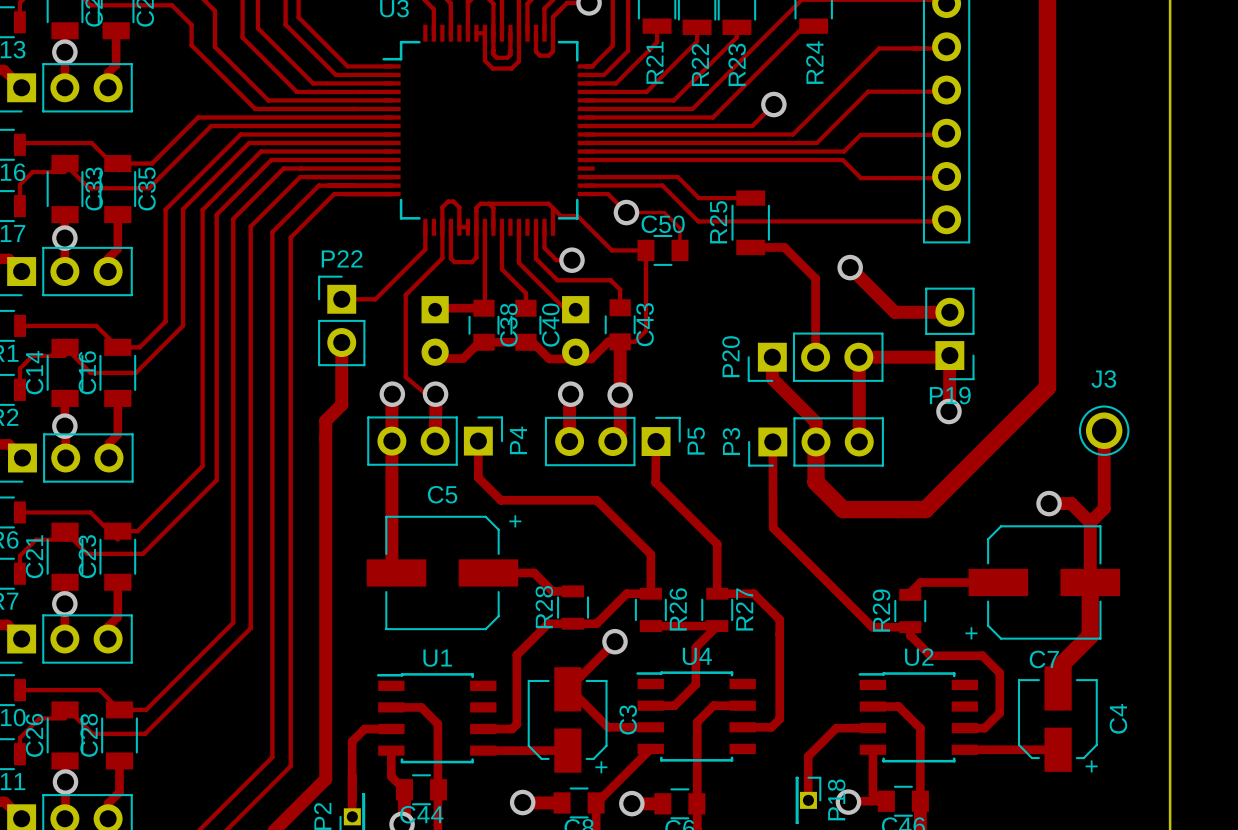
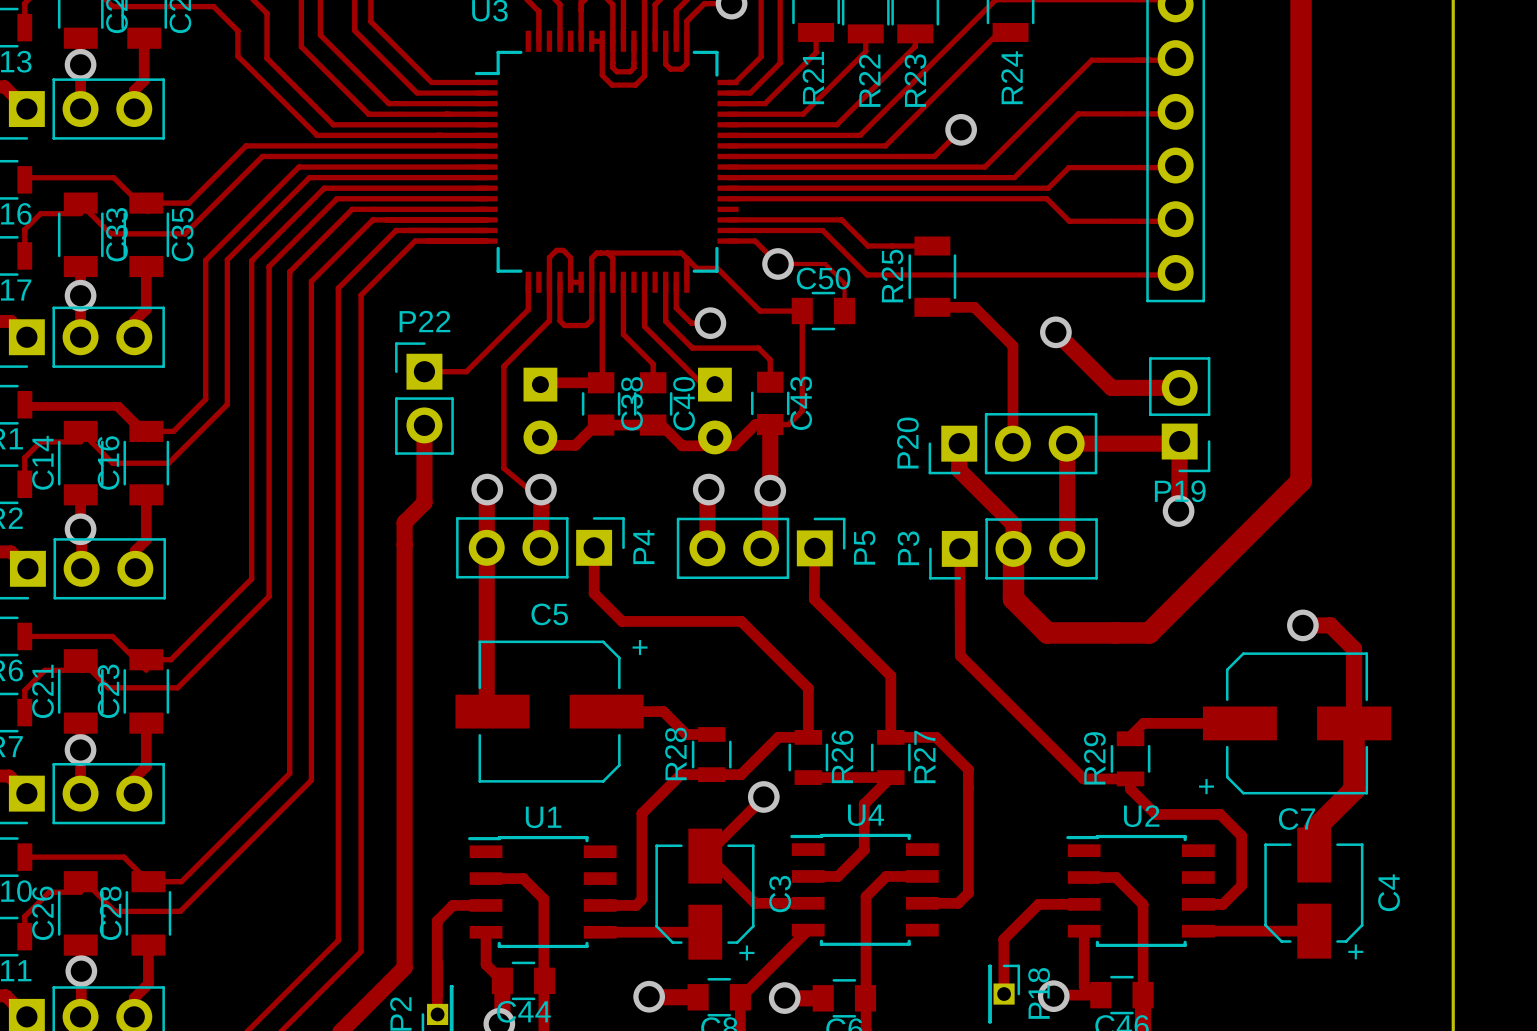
track: none -> (24, 408) (116, 408) (147, 439)
track: (1104, 430) (1104, 508) (1090, 522) -> none
J3: (1104, 430) -> none

